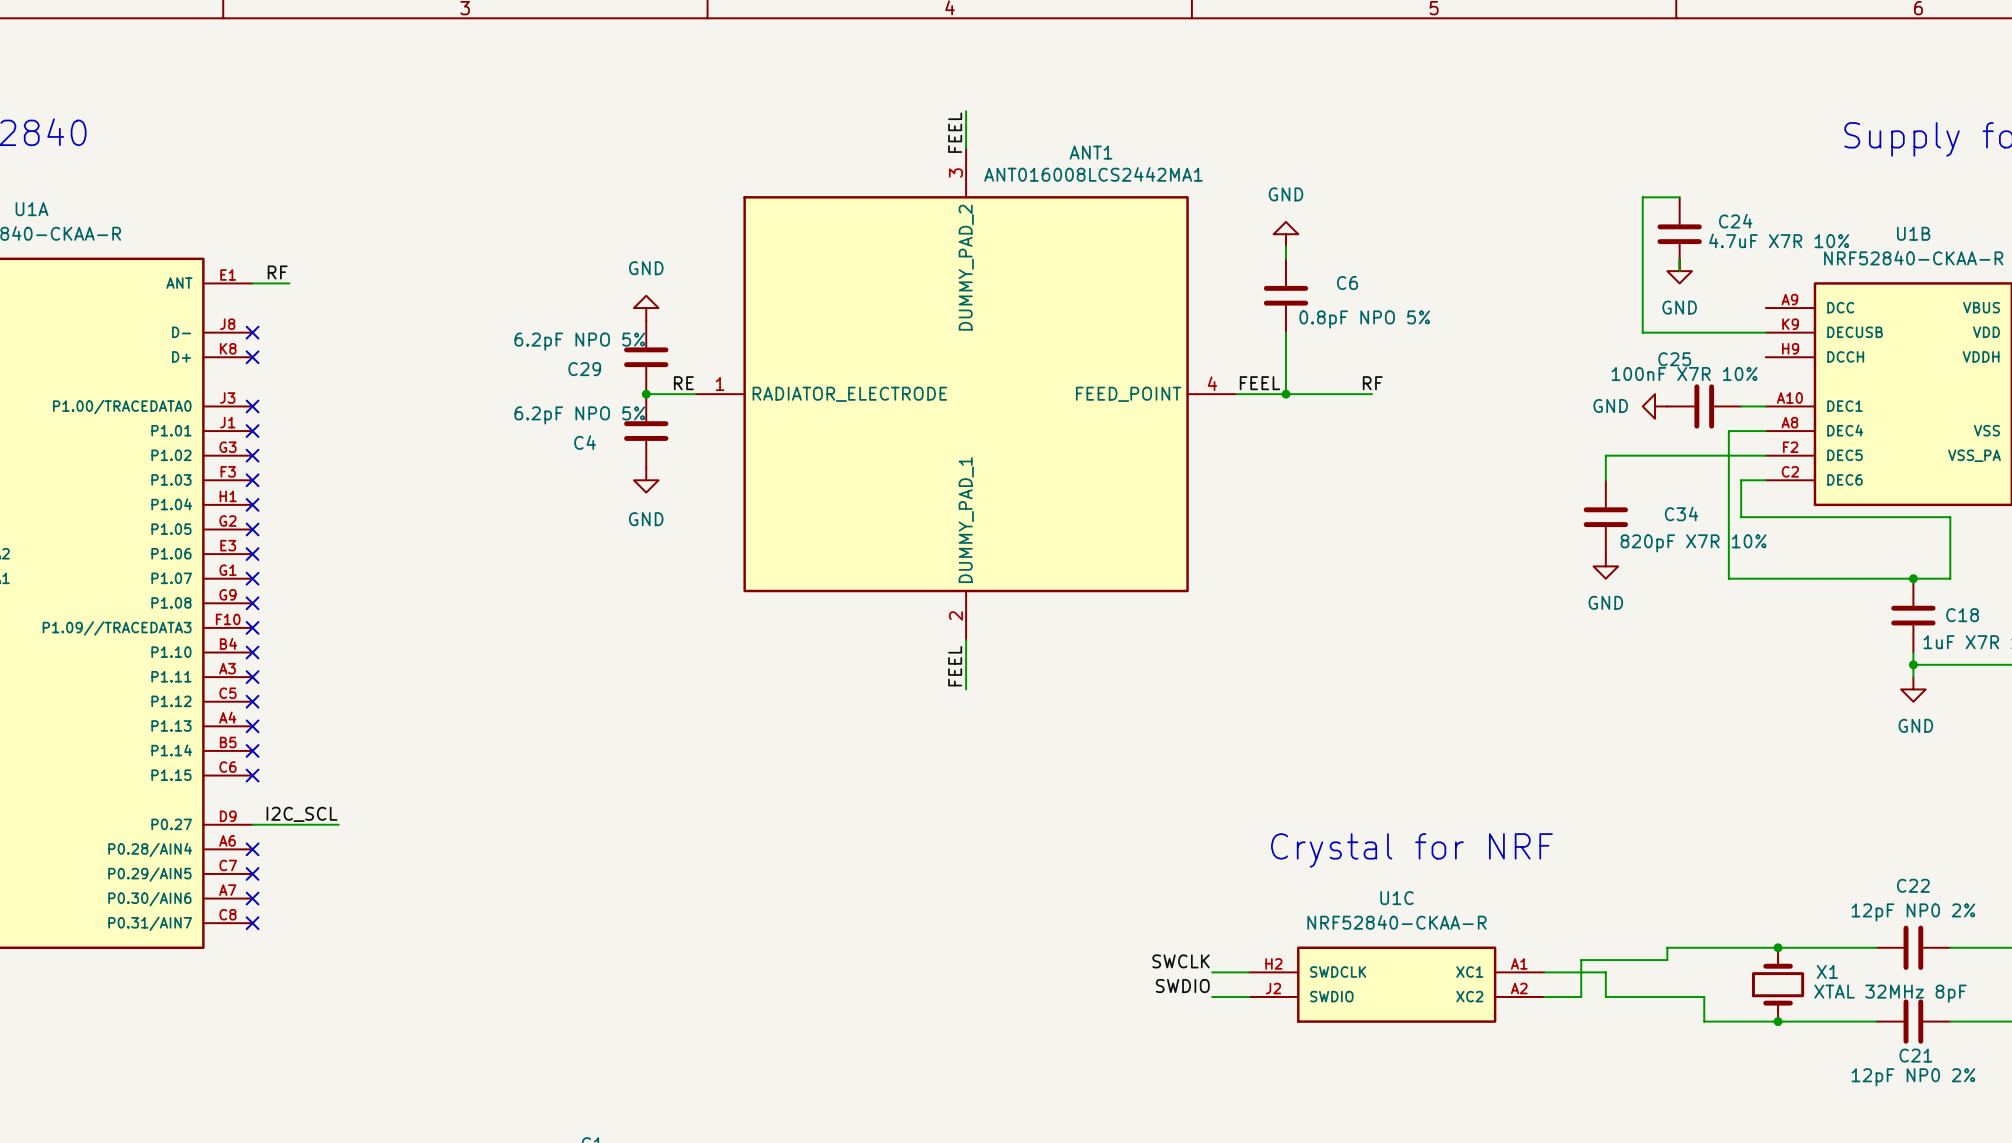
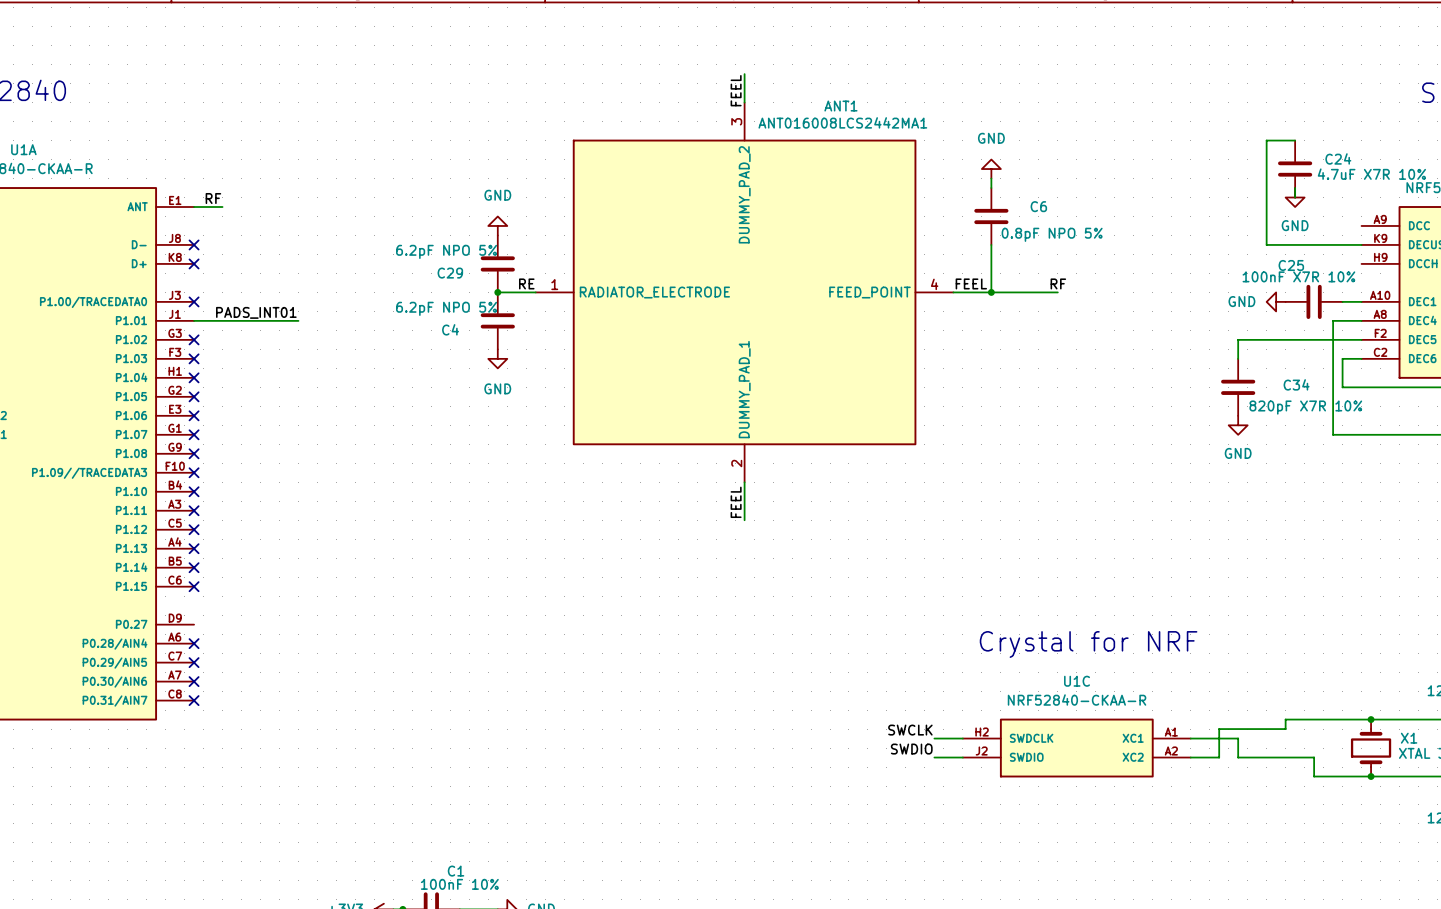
label: none -> PADS_INT01 (256, 312)
wire: none -> (194, 320) (298, 320)
no-connect mark: (252, 431) -> none
label: I2C_SCL (301, 814) -> none
wire: (252, 824) (338, 824) -> none

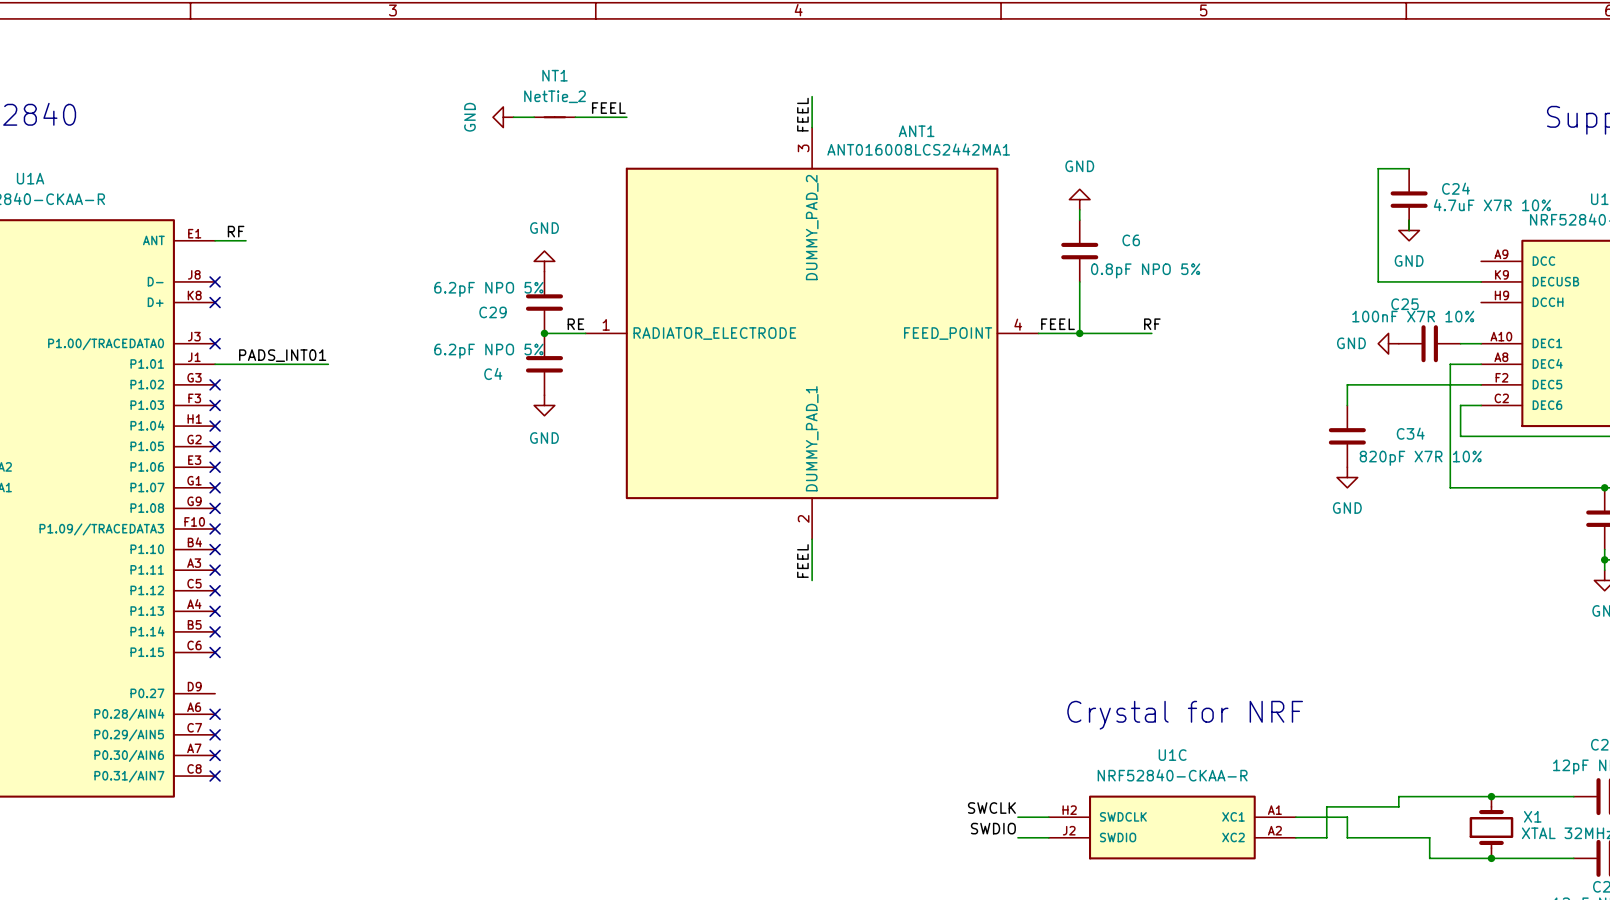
label: none -> FEEL (608, 108)
power symbol: none -> GND (503, 117)
wire: none -> (513, 117) (534, 117)
NT1: none -> NetTie_2 (554, 117)
wire: none -> (575, 117) (626, 117)

